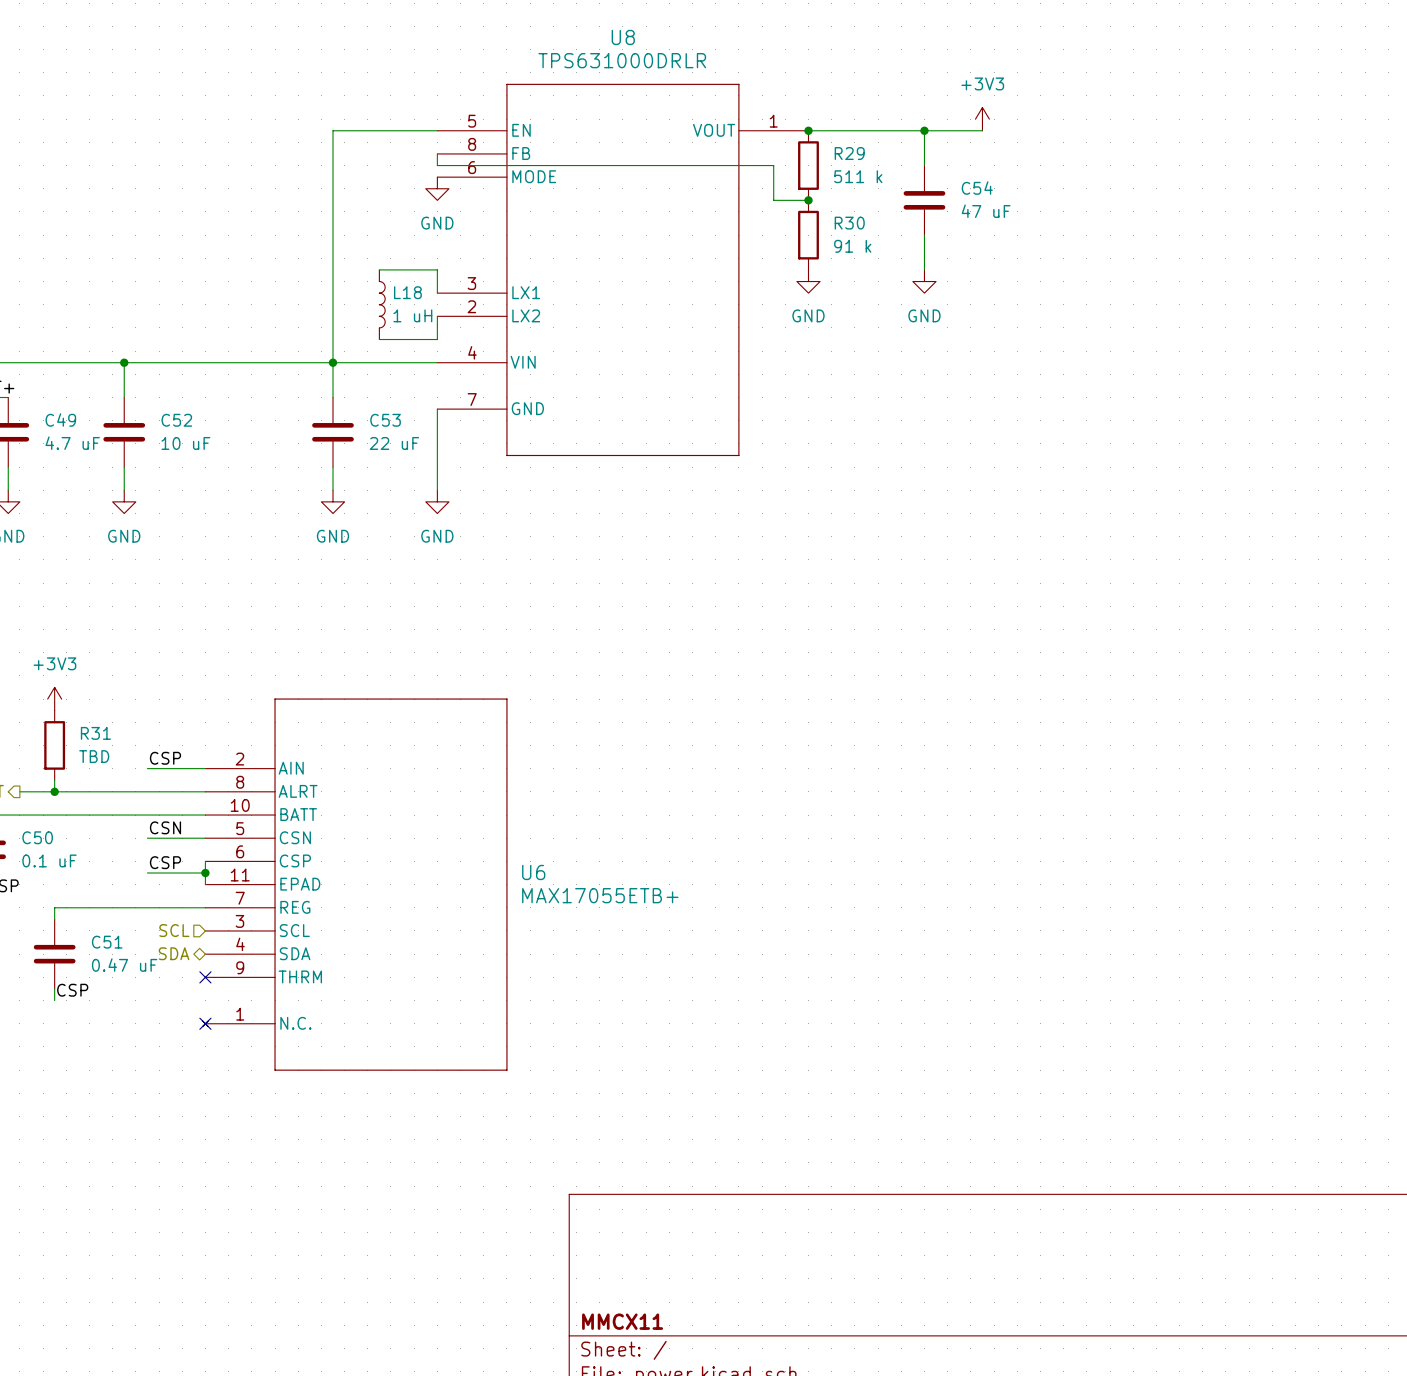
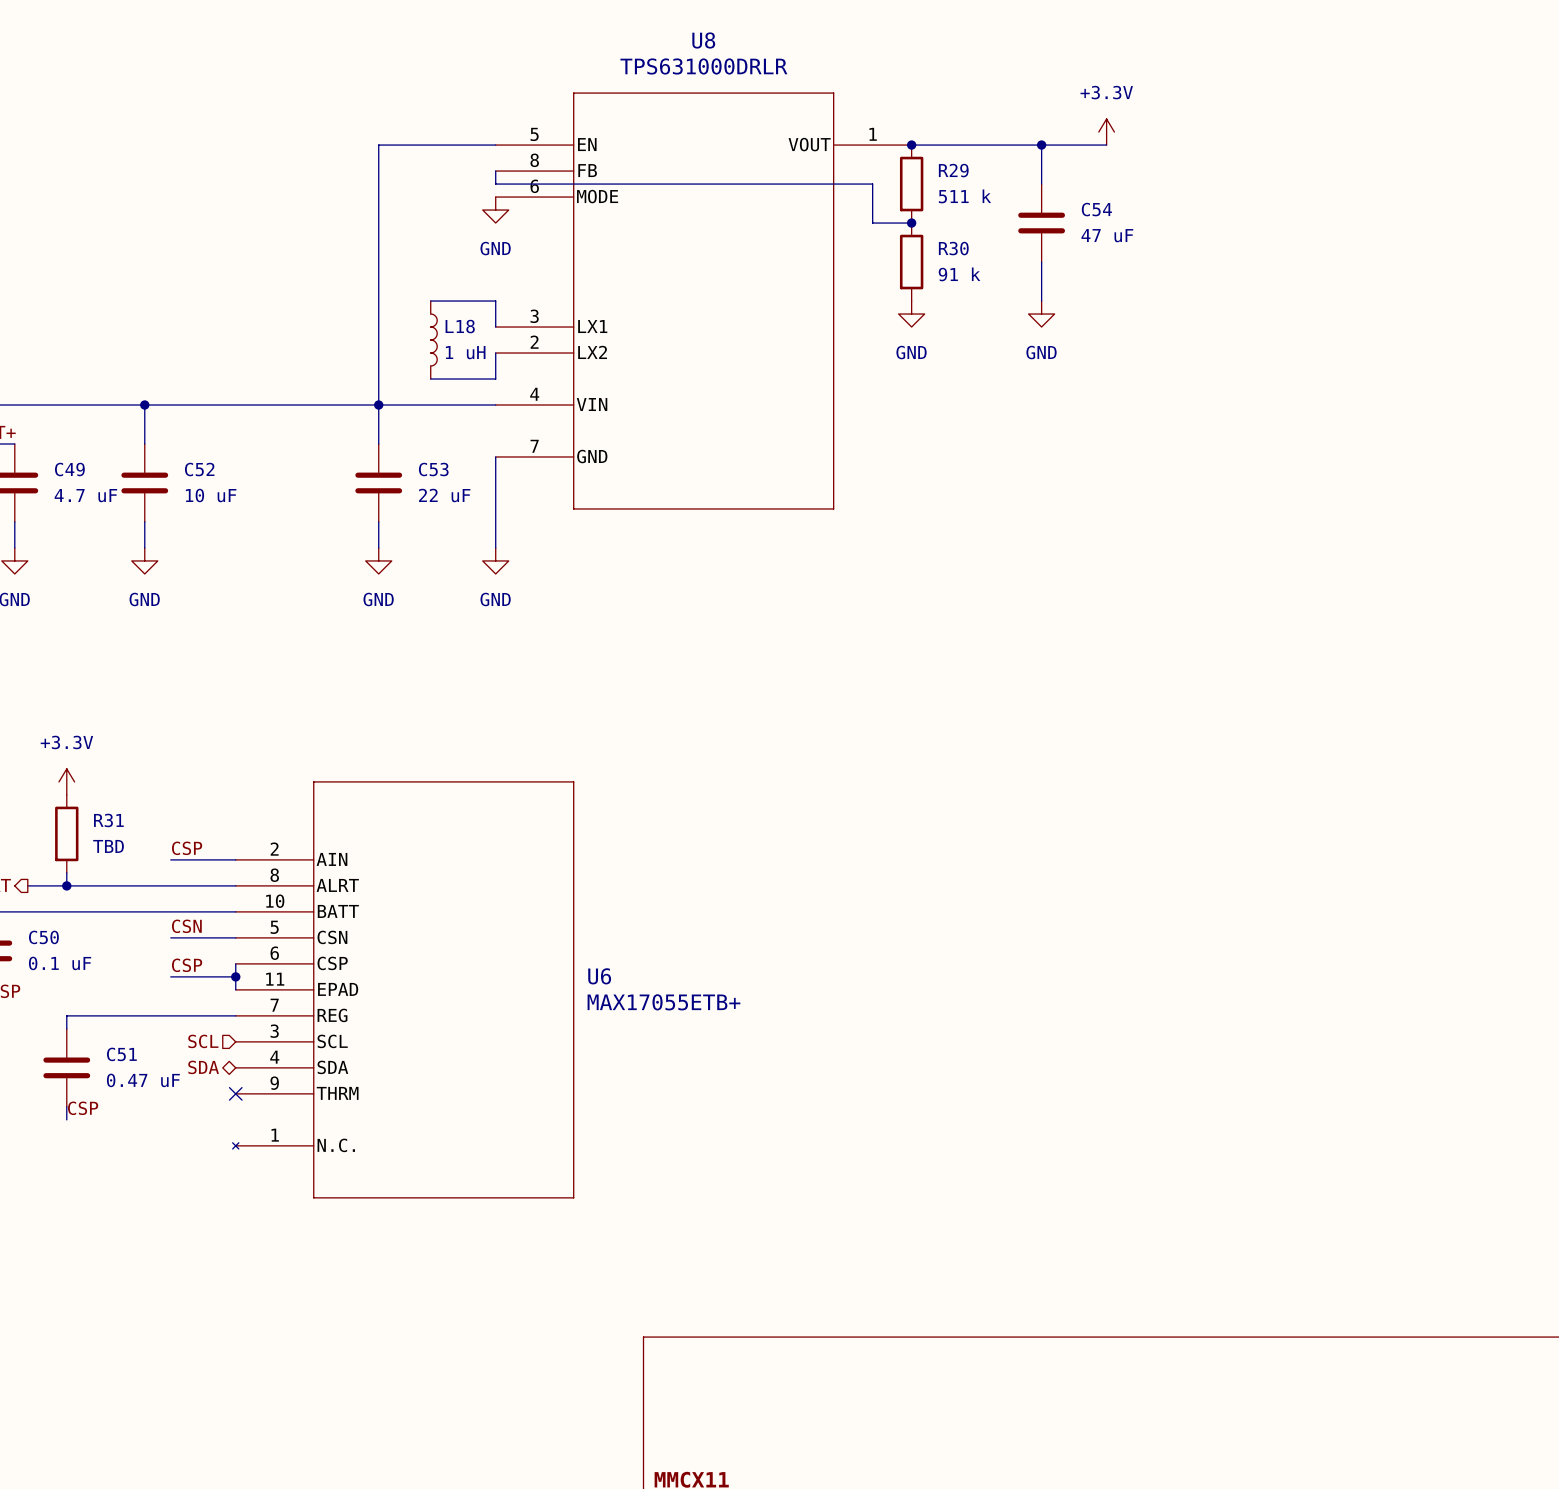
power symbol: +3V3 (982, 119) -> +3.3V (1106, 132)
power symbol: +3V3 (54, 699) -> +3.3V (66, 781)
no-connect mark: (205, 1023) -> none

